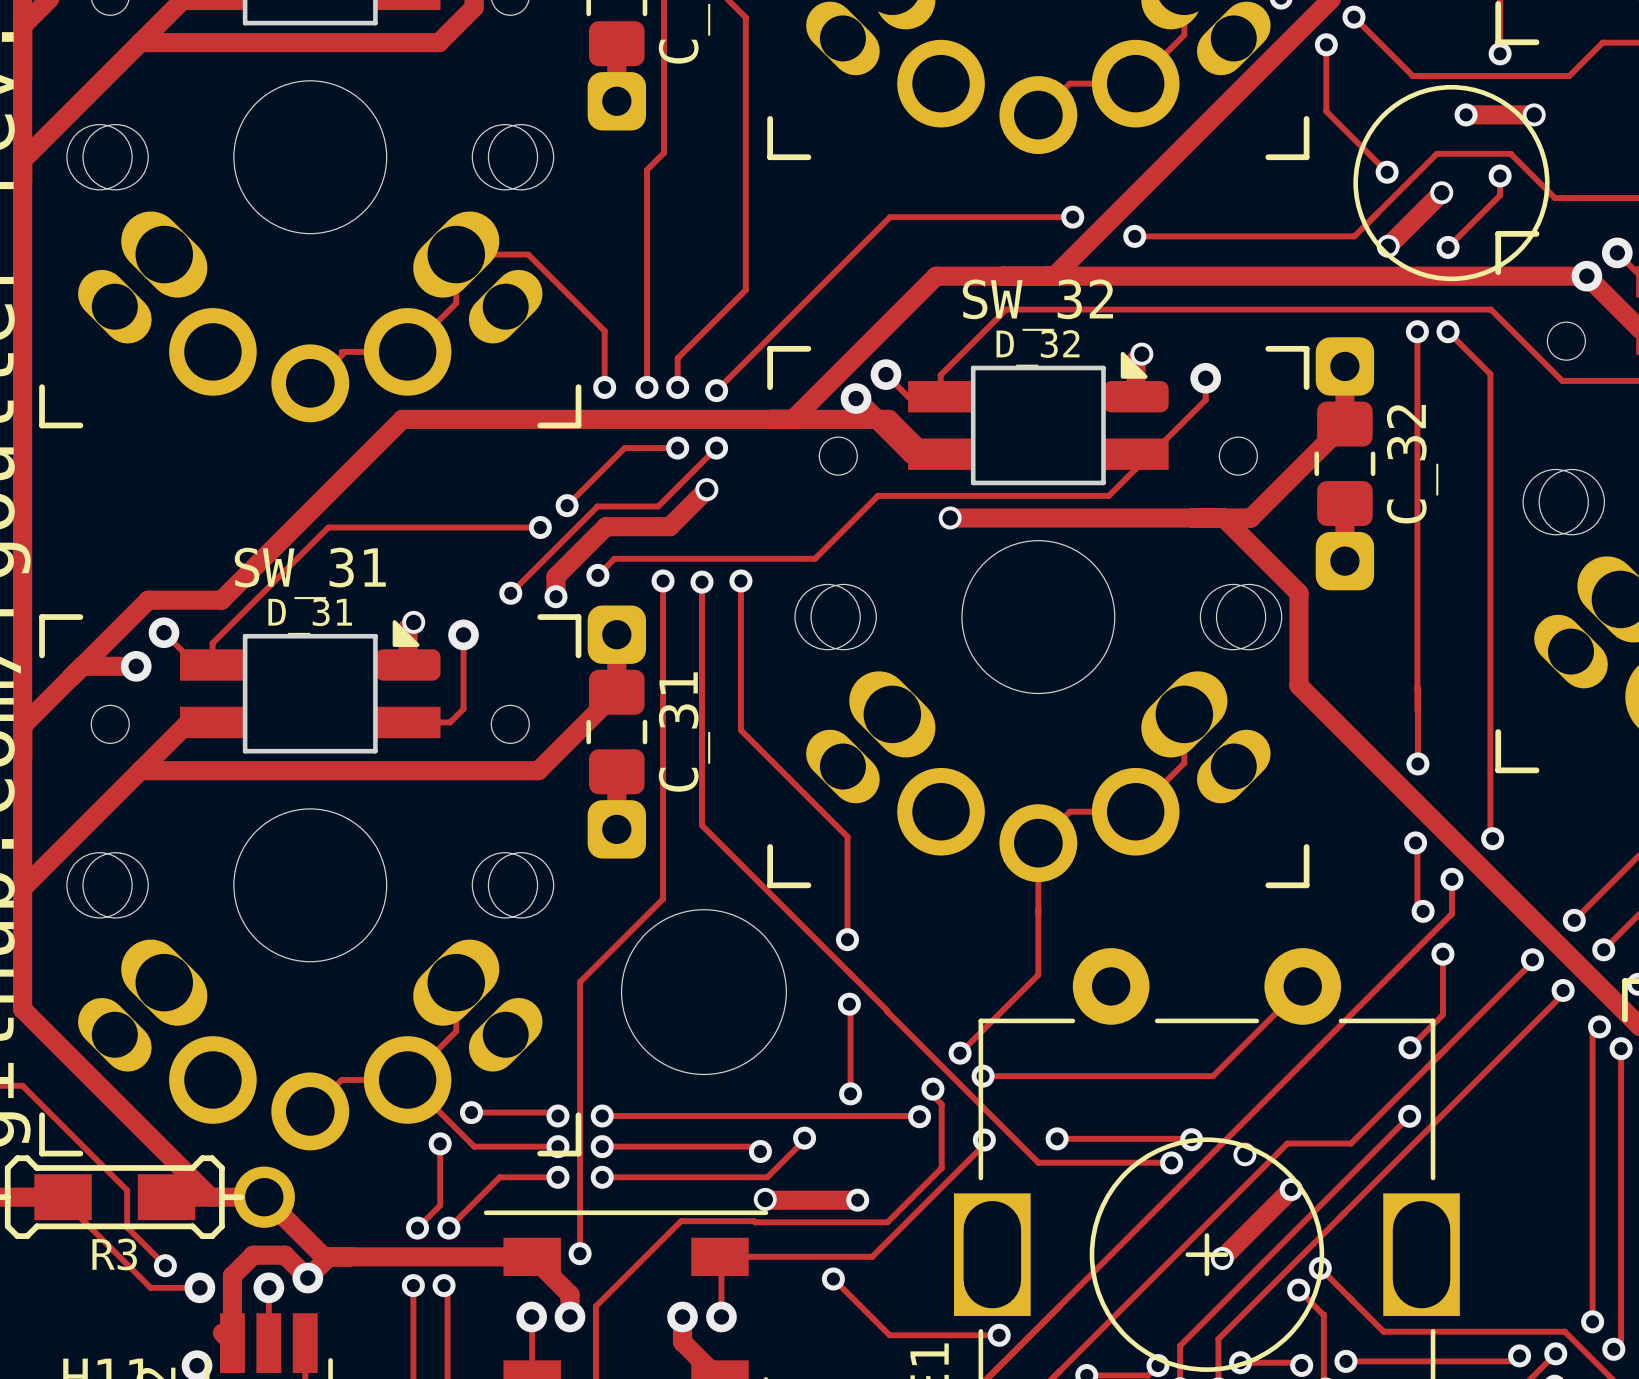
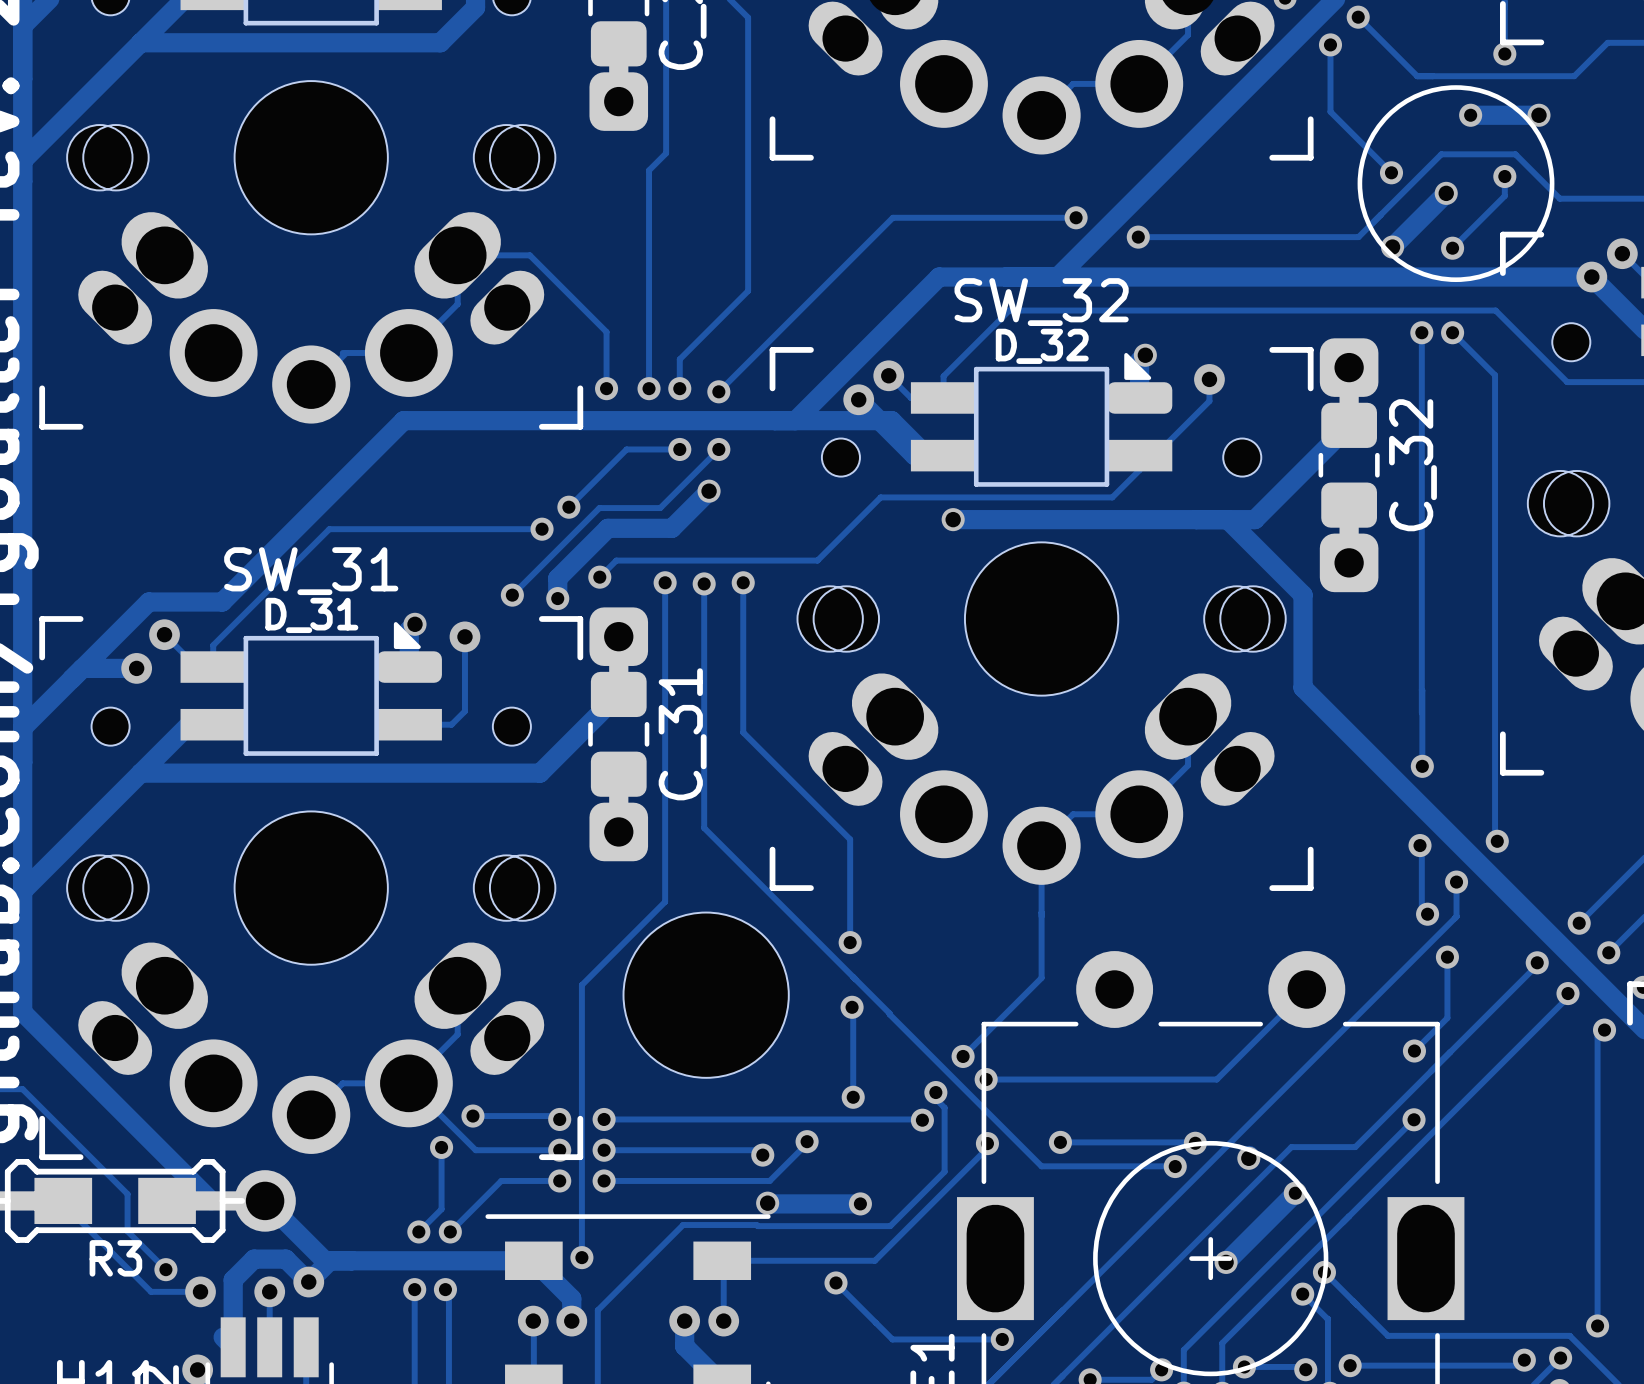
track: (1621, 1048) (1621, 1342) (1613, 1349) -> none
via: (1621, 1048) -> none
via: (1613, 1349) -> none

